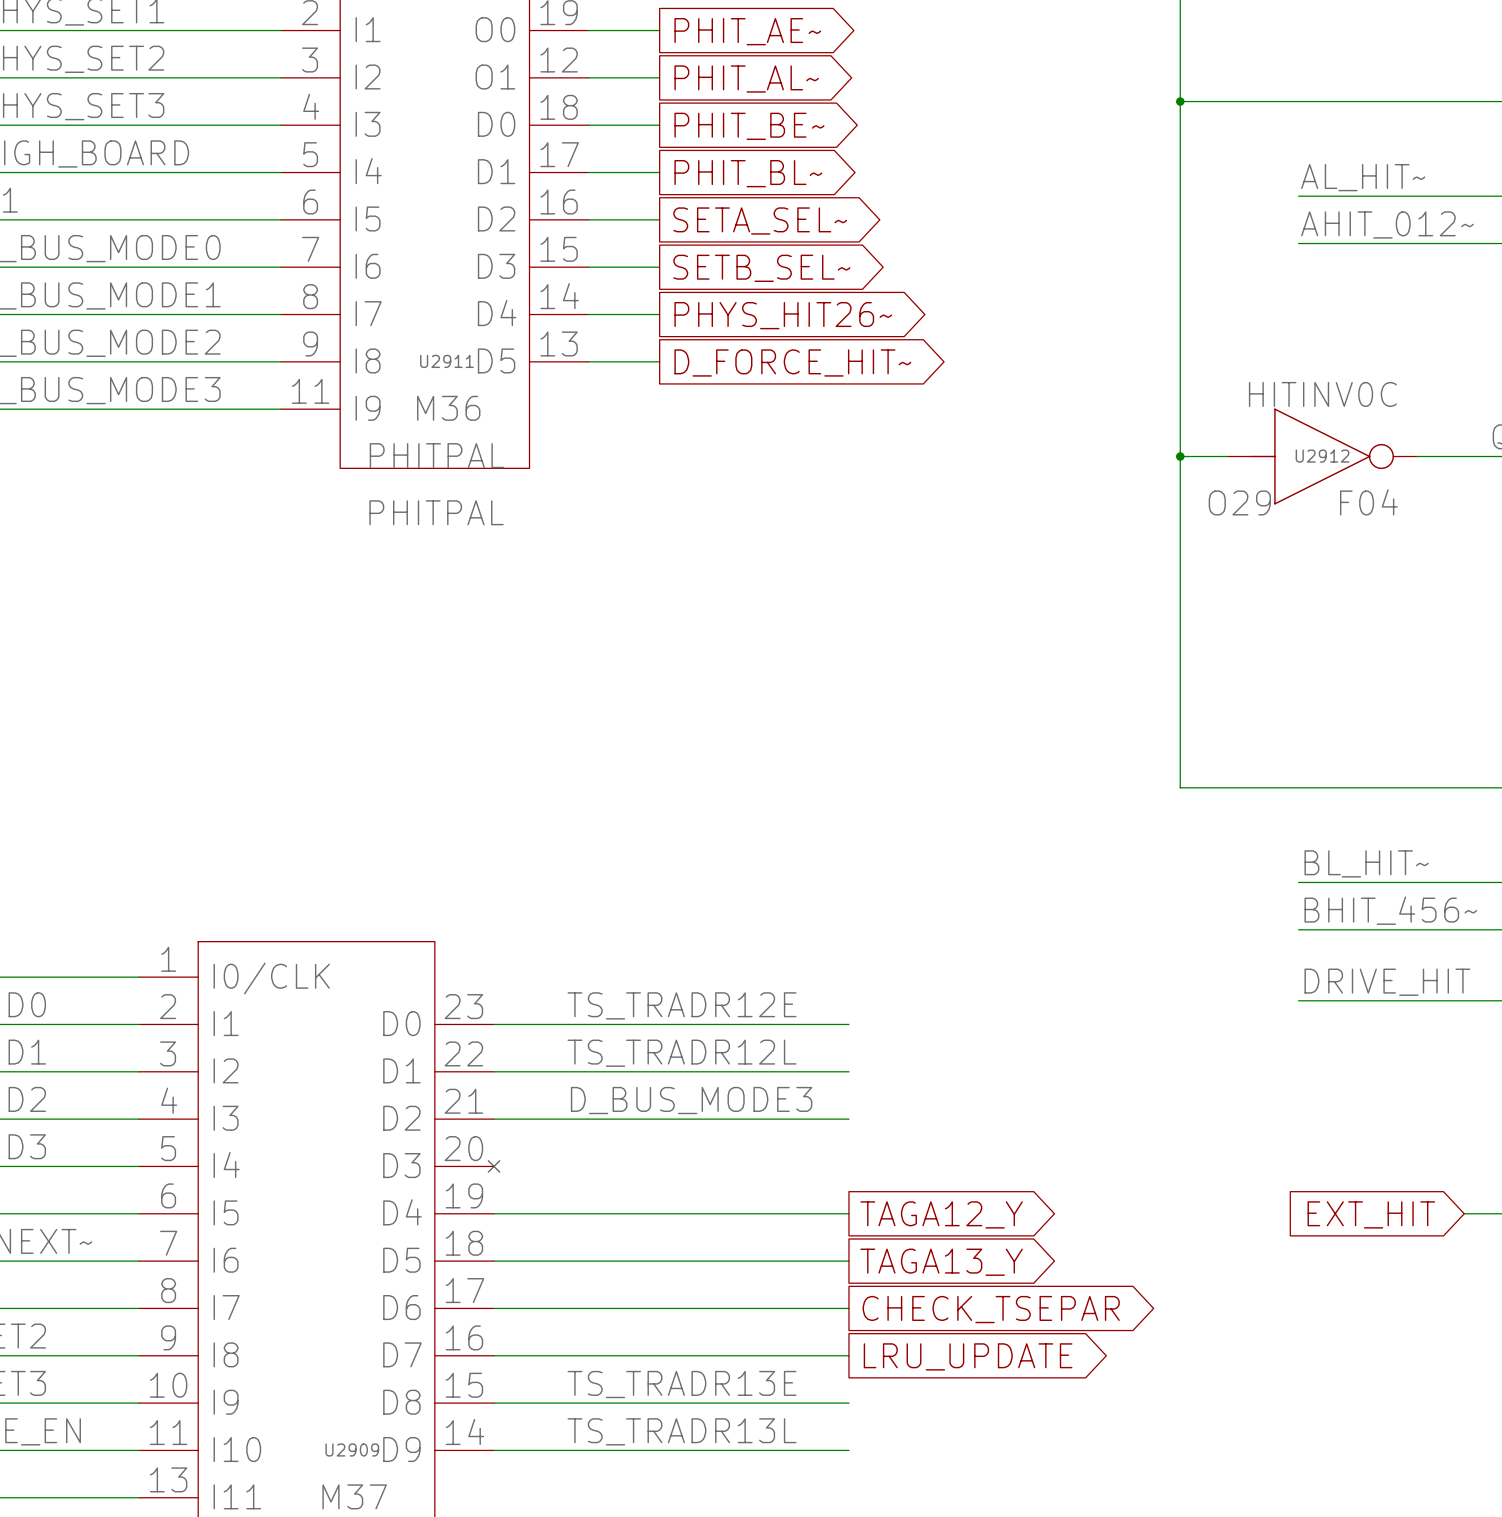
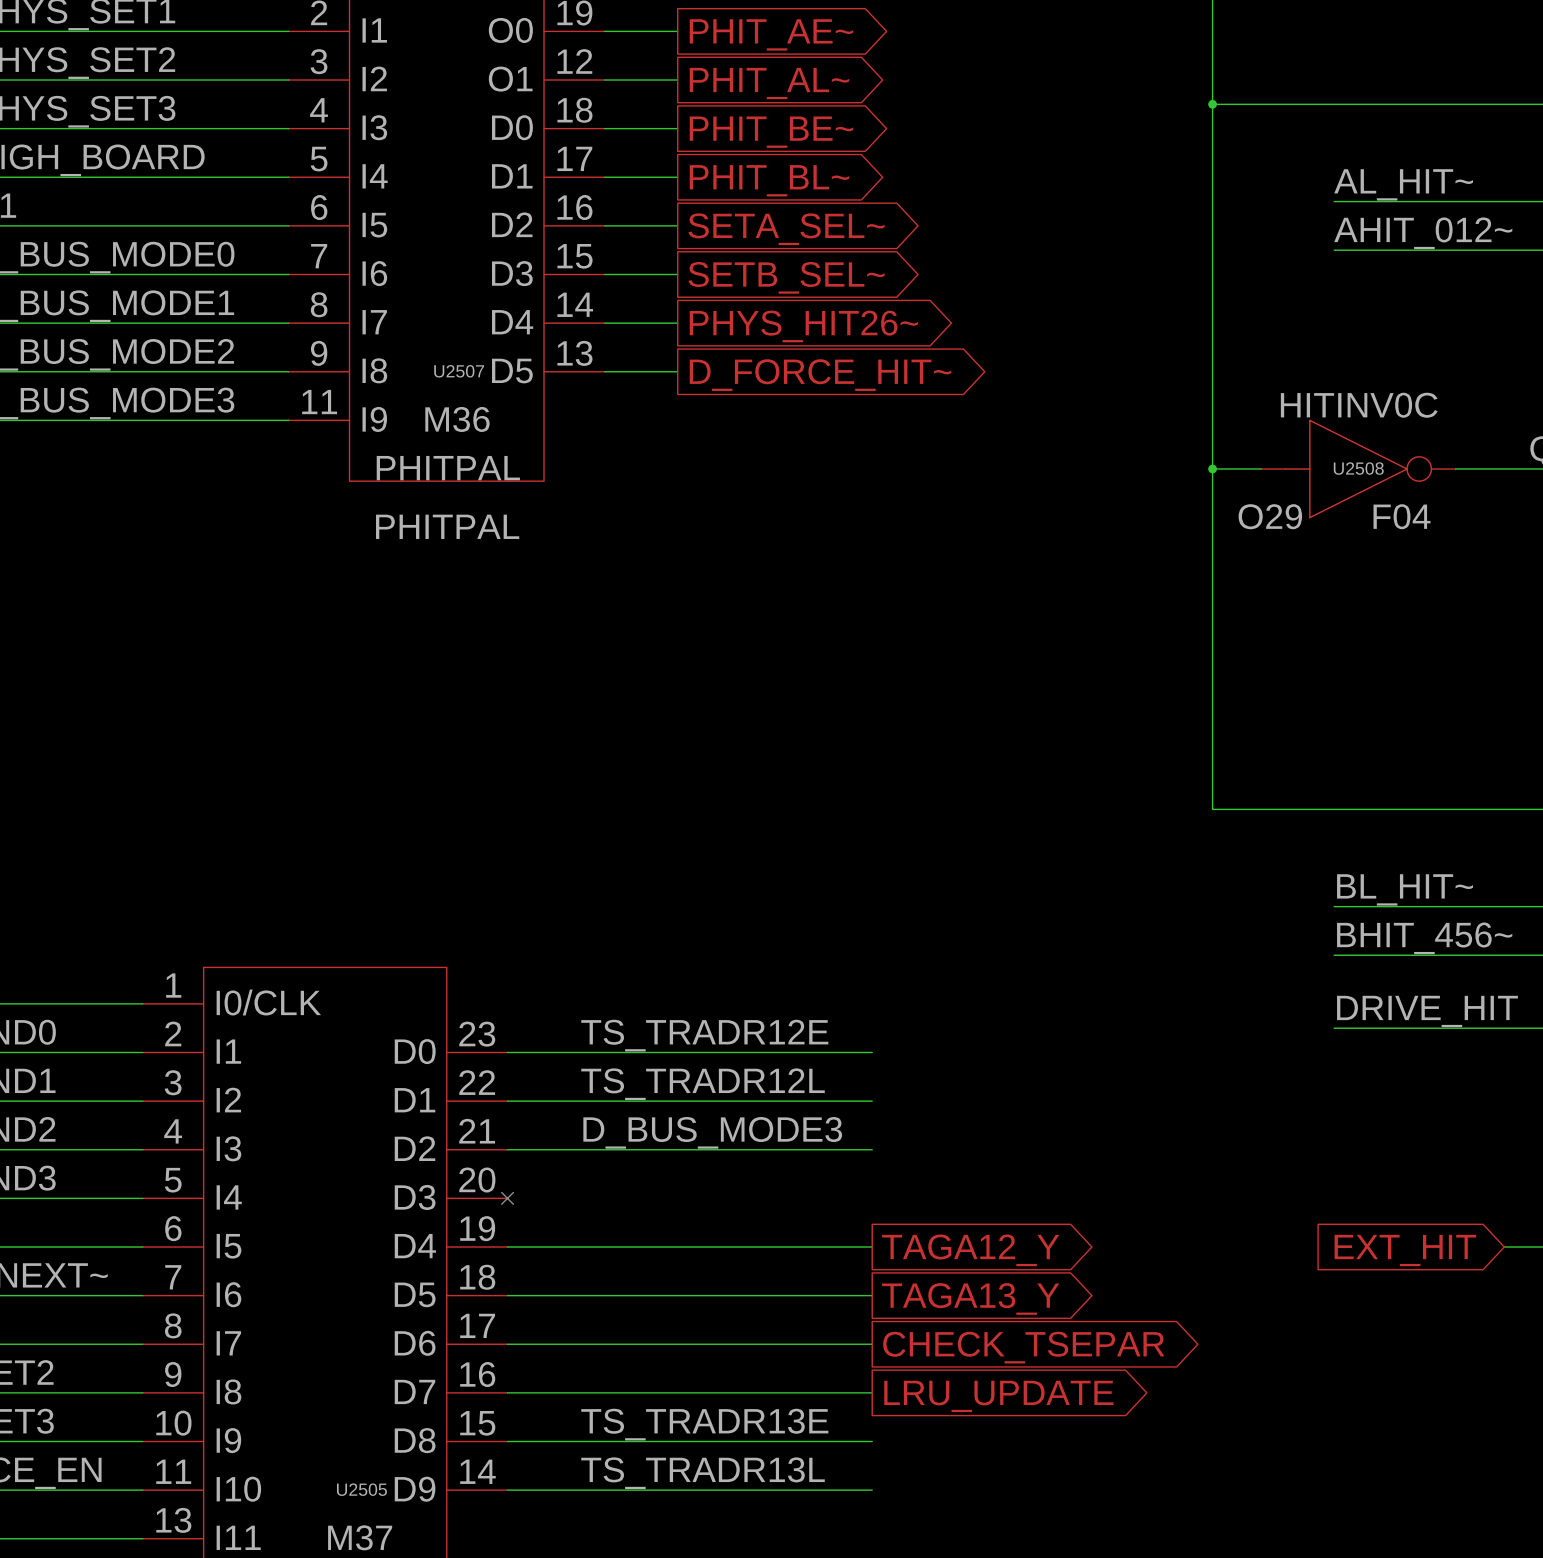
U2911 name: U2911 (446, 361) -> U2507 (459, 371)
U2912 name: U2912 (1322, 456) -> U2508 (1358, 468)
U2909 name: U2909 (352, 1449) -> U2505 (361, 1489)

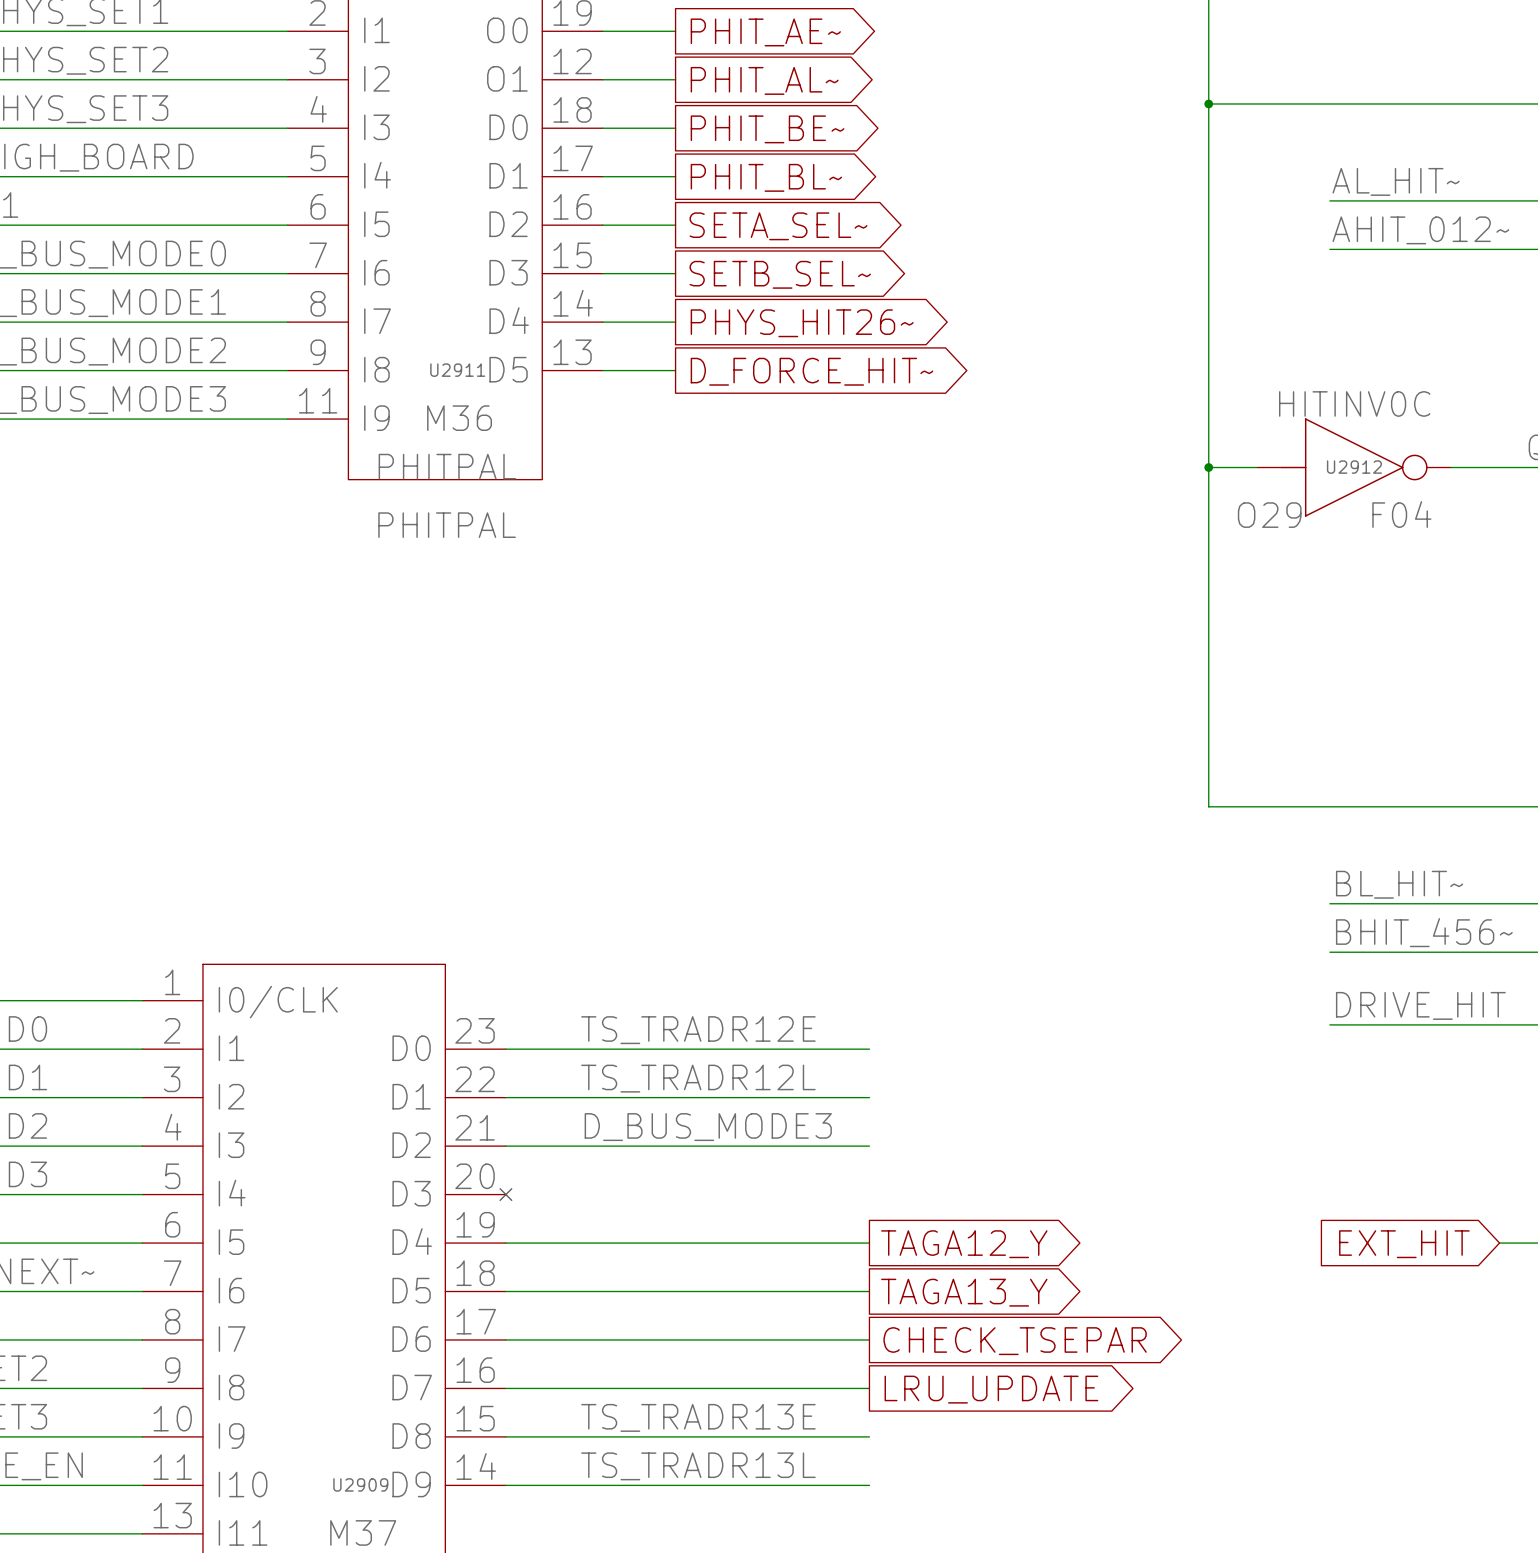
U2507 name: U2507 (459, 371) -> U2911 (457, 370)
U2508 name: U2508 (1358, 468) -> U2912 (1354, 467)
U2505 name: U2505 (361, 1489) -> U2909 (360, 1484)

